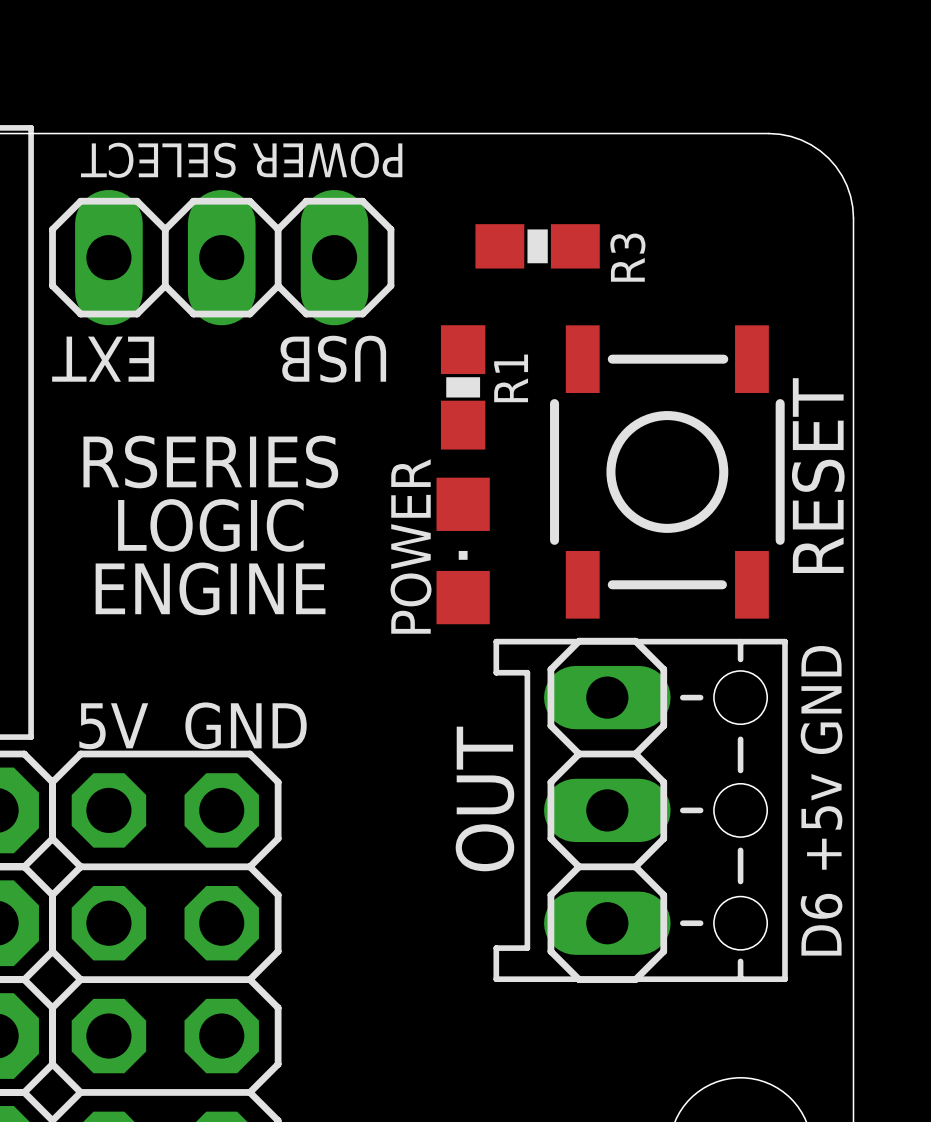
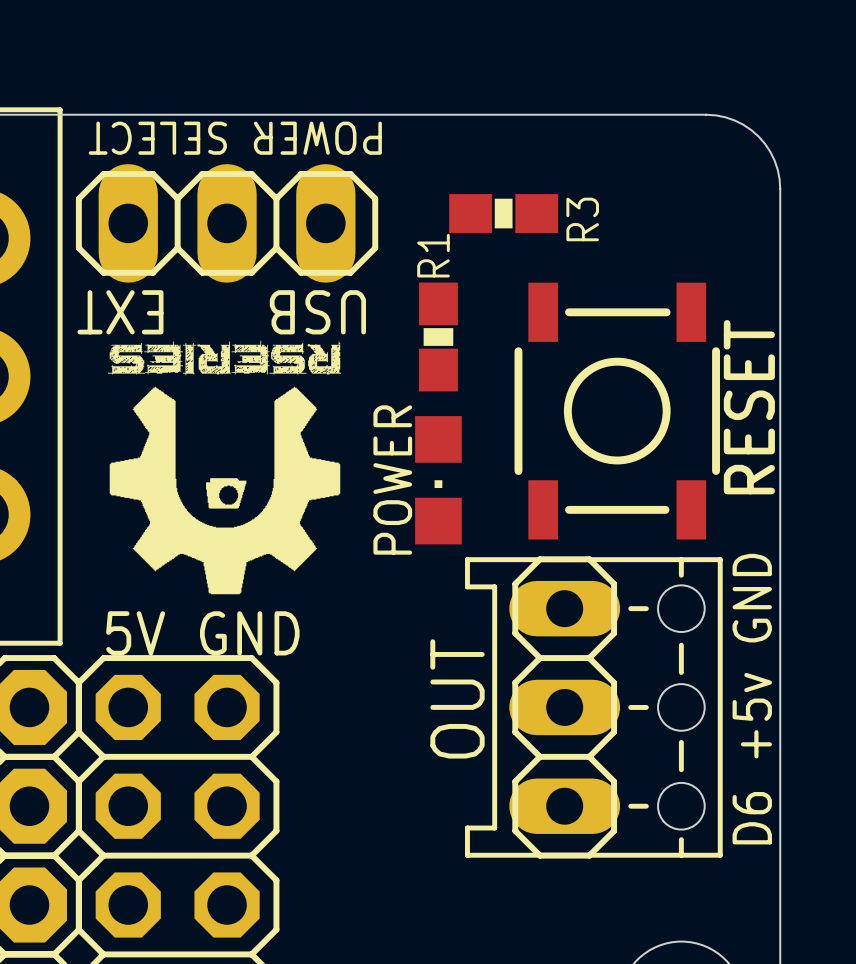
R1 name position: R1 (511, 378) -> R1 (433, 255)
drawing: none -> [108, 340, 342, 595]
text: RSERIES (210, 461) -> none
text: LOGIC (210, 525) -> none
text: ENGINE (210, 588) -> none

